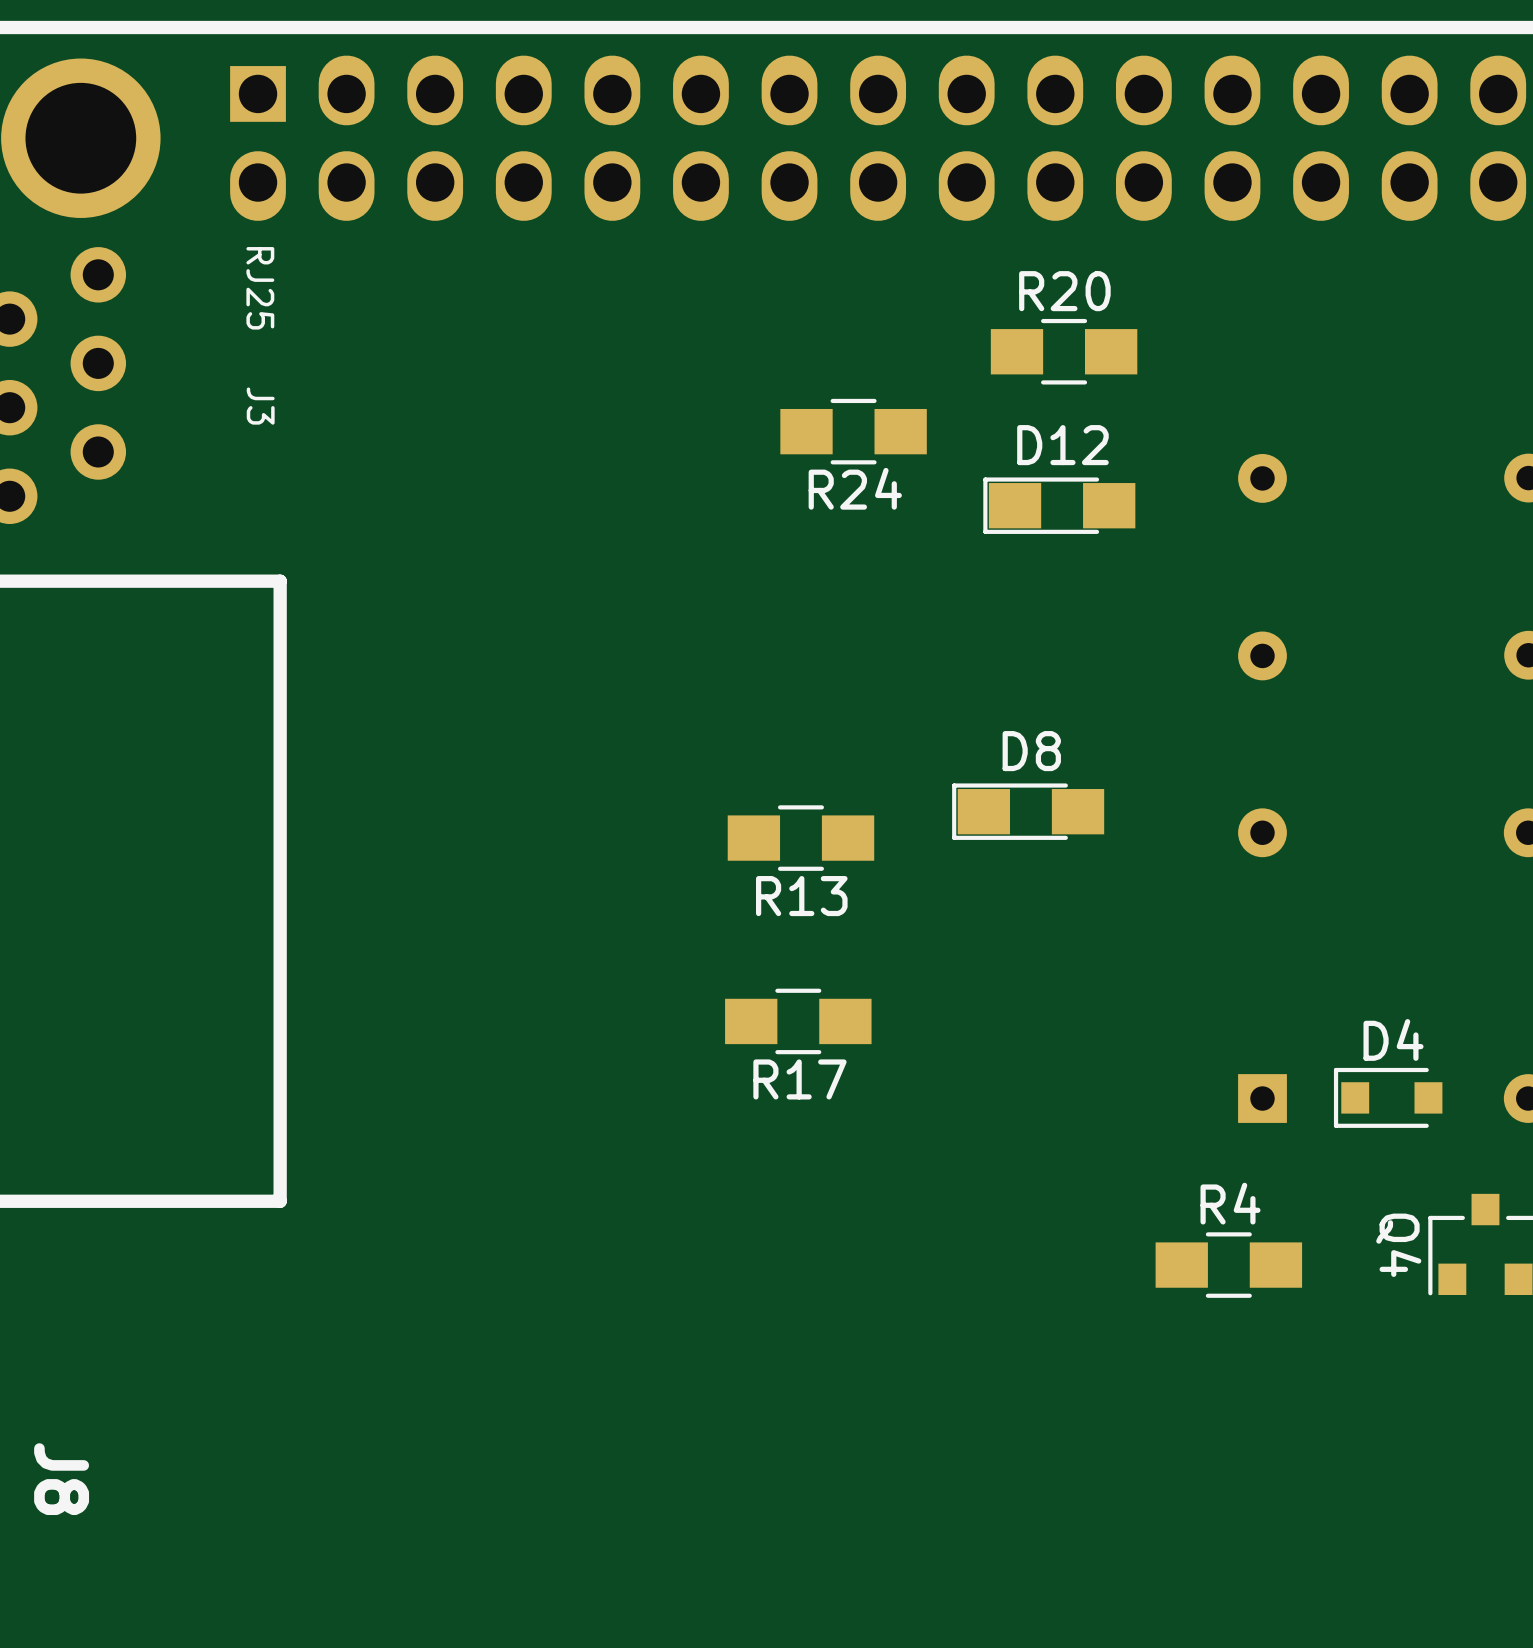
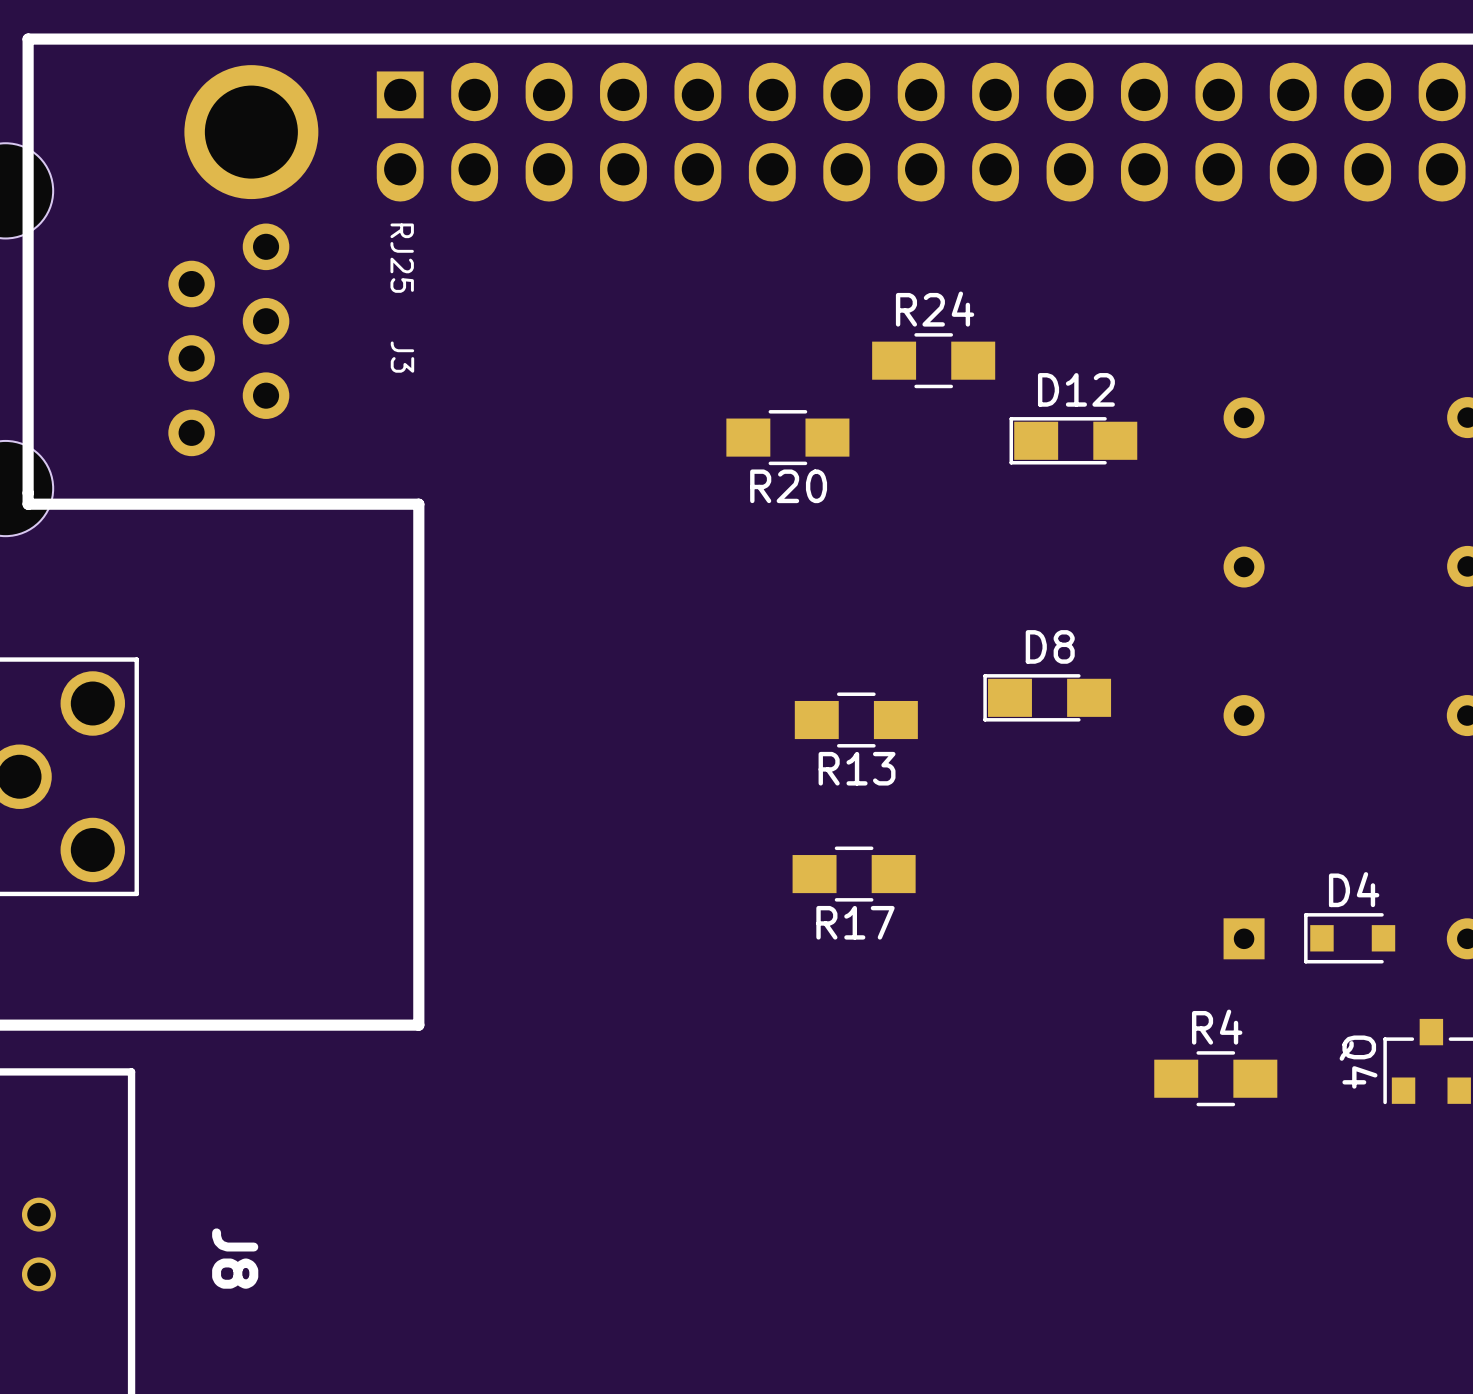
R20 name position: R20 (1064, 291) -> R20 (788, 486)
R20 position: (1064, 351) -> (787, 437)
R24 position: (853, 431) -> (933, 360)
R24 name position: R24 (855, 488) -> R24 (935, 309)

